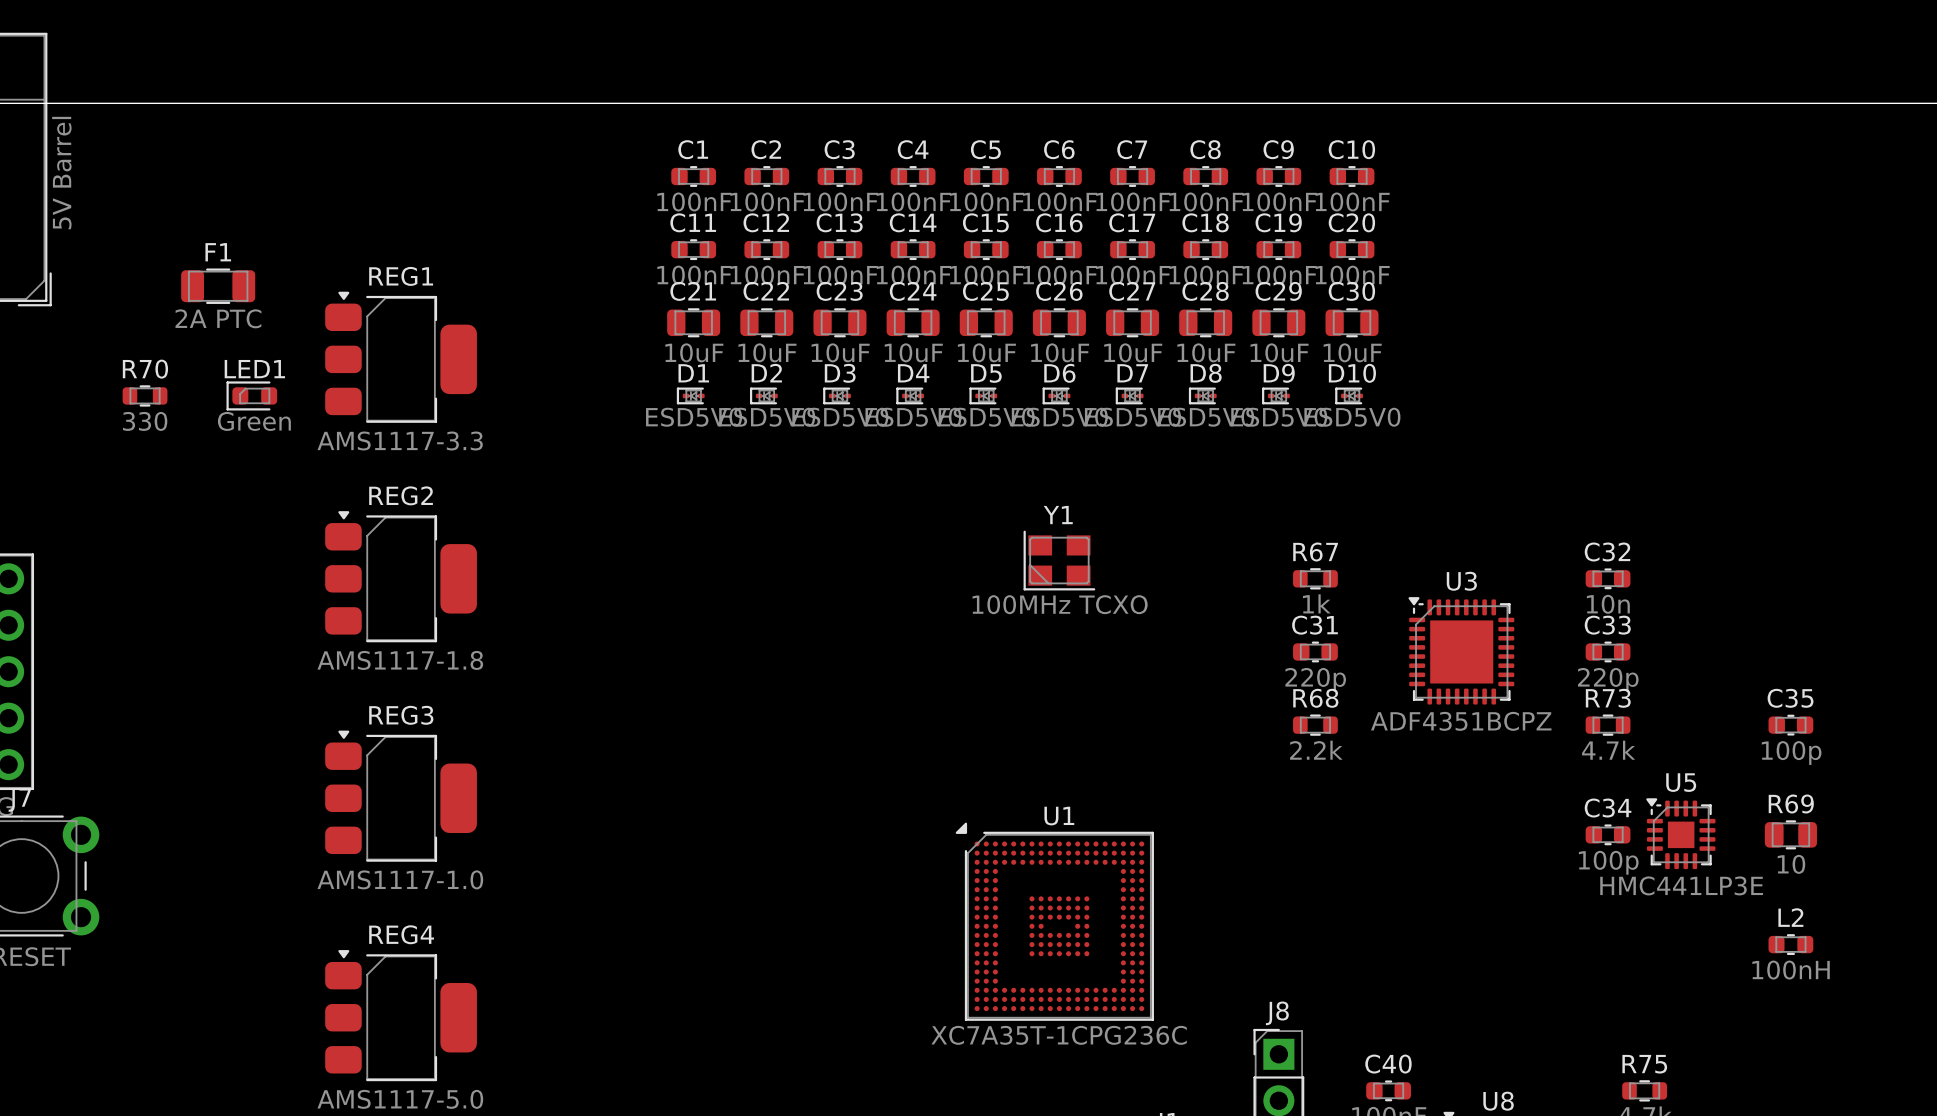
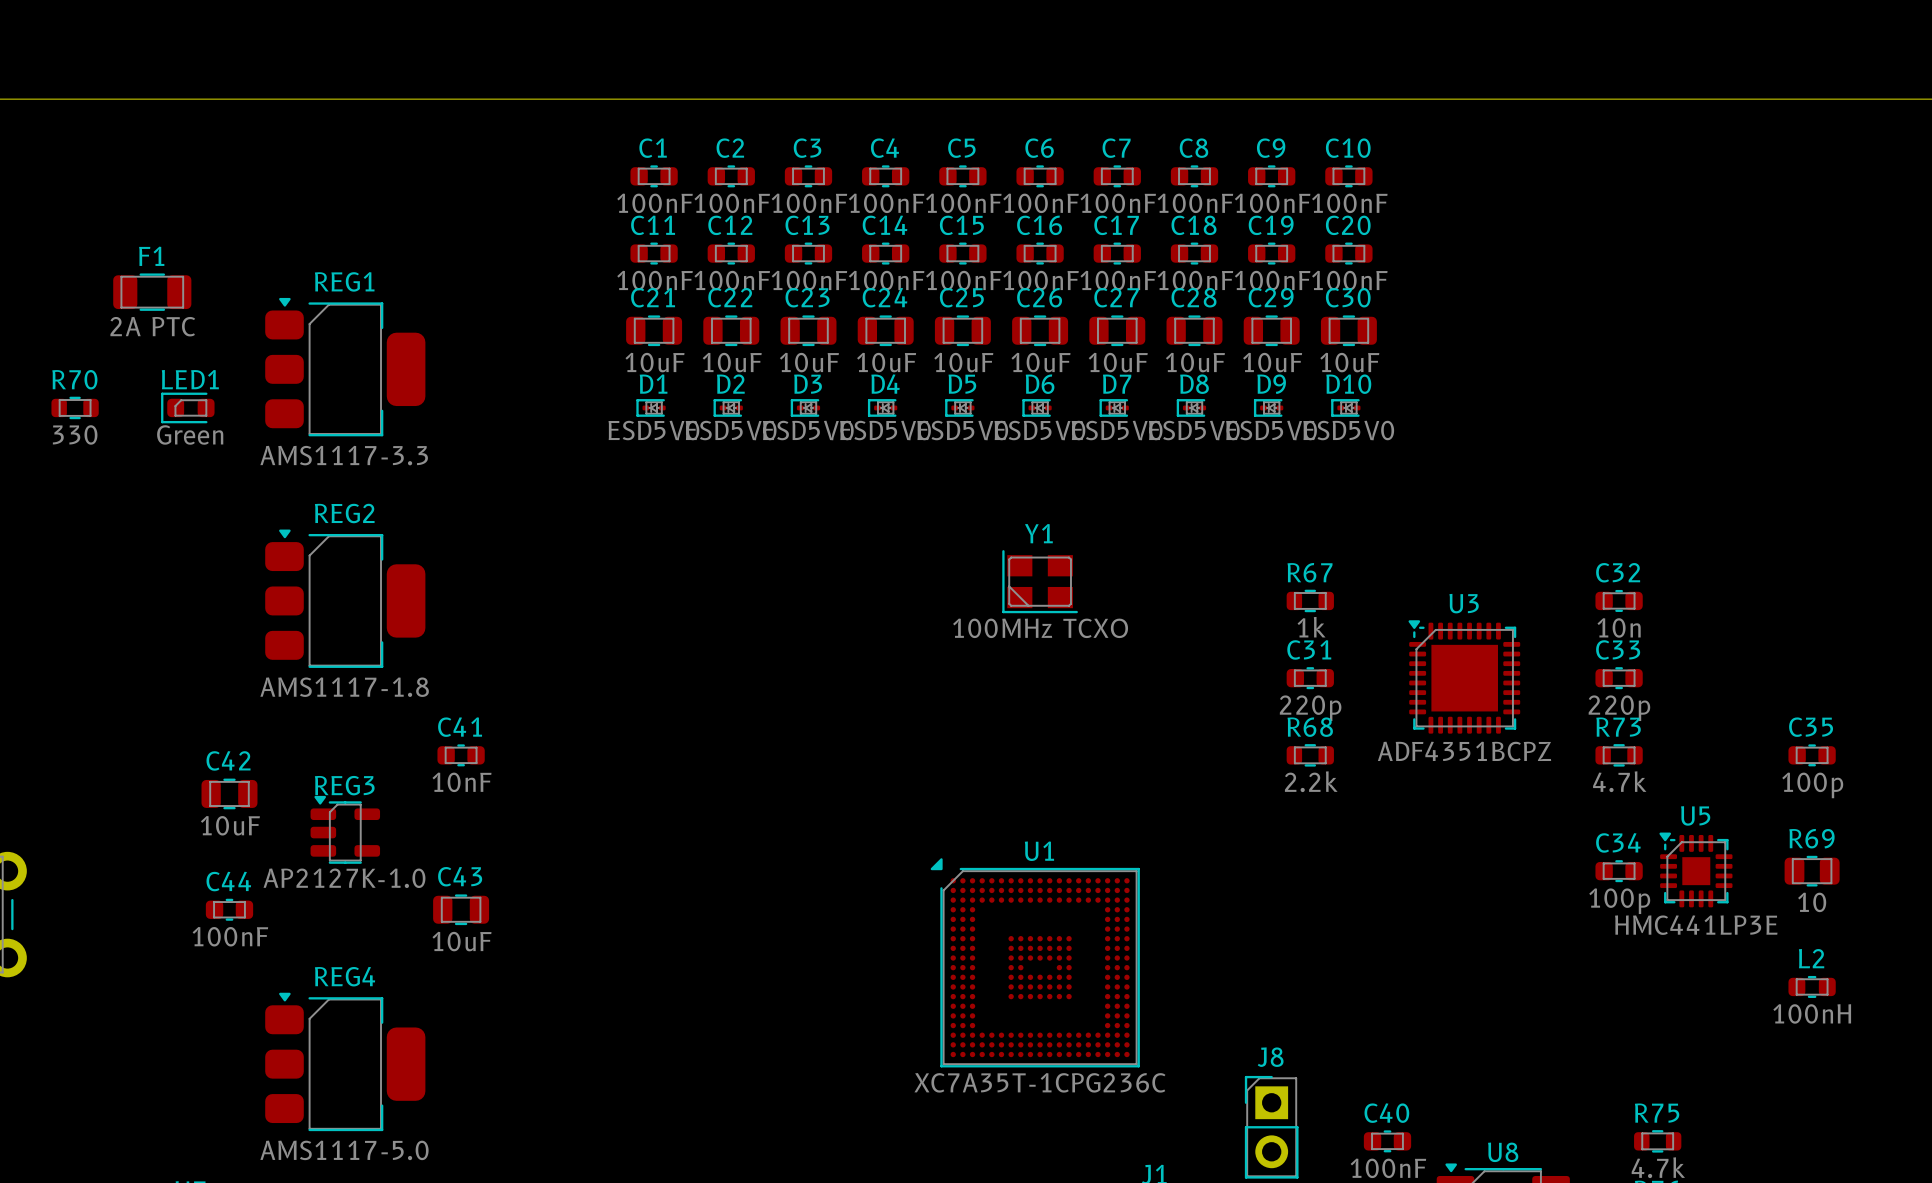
REG3 name position: REG3 (401, 715) -> REG3 (344, 785)
C41: none -> 10nF (461, 755)
REG3 footprint: [325, 730, 477, 862] -> [310, 795, 381, 864]
C42: none -> 10uF (229, 793)
C44: none -> 100nF (229, 909)
C43: none -> 10uF (461, 909)
REG3 value: AMS1117-1.0 (400, 879) -> AP2127K-1.0 (344, 878)

